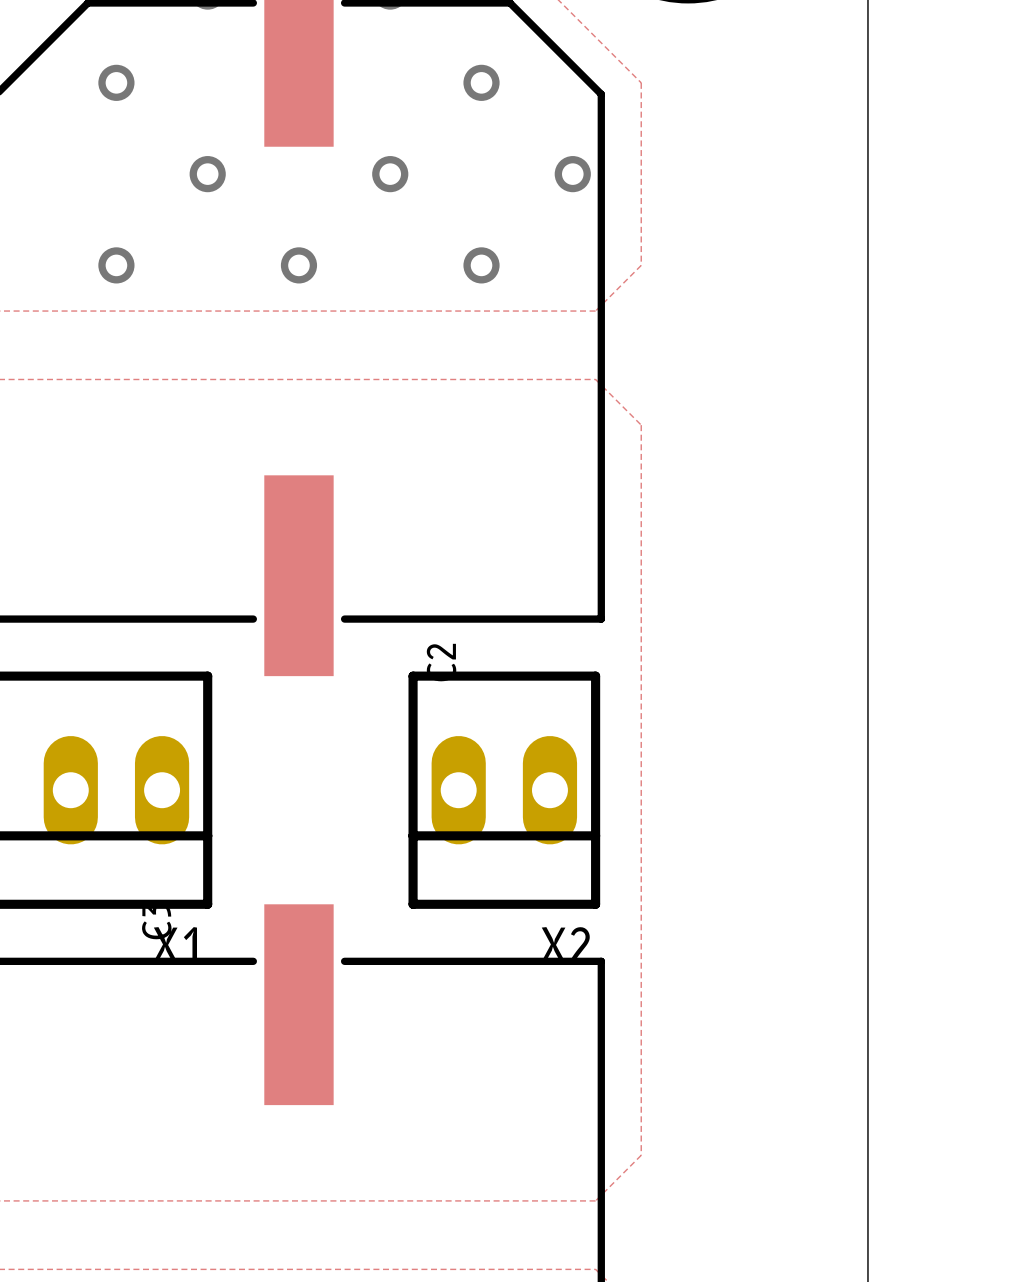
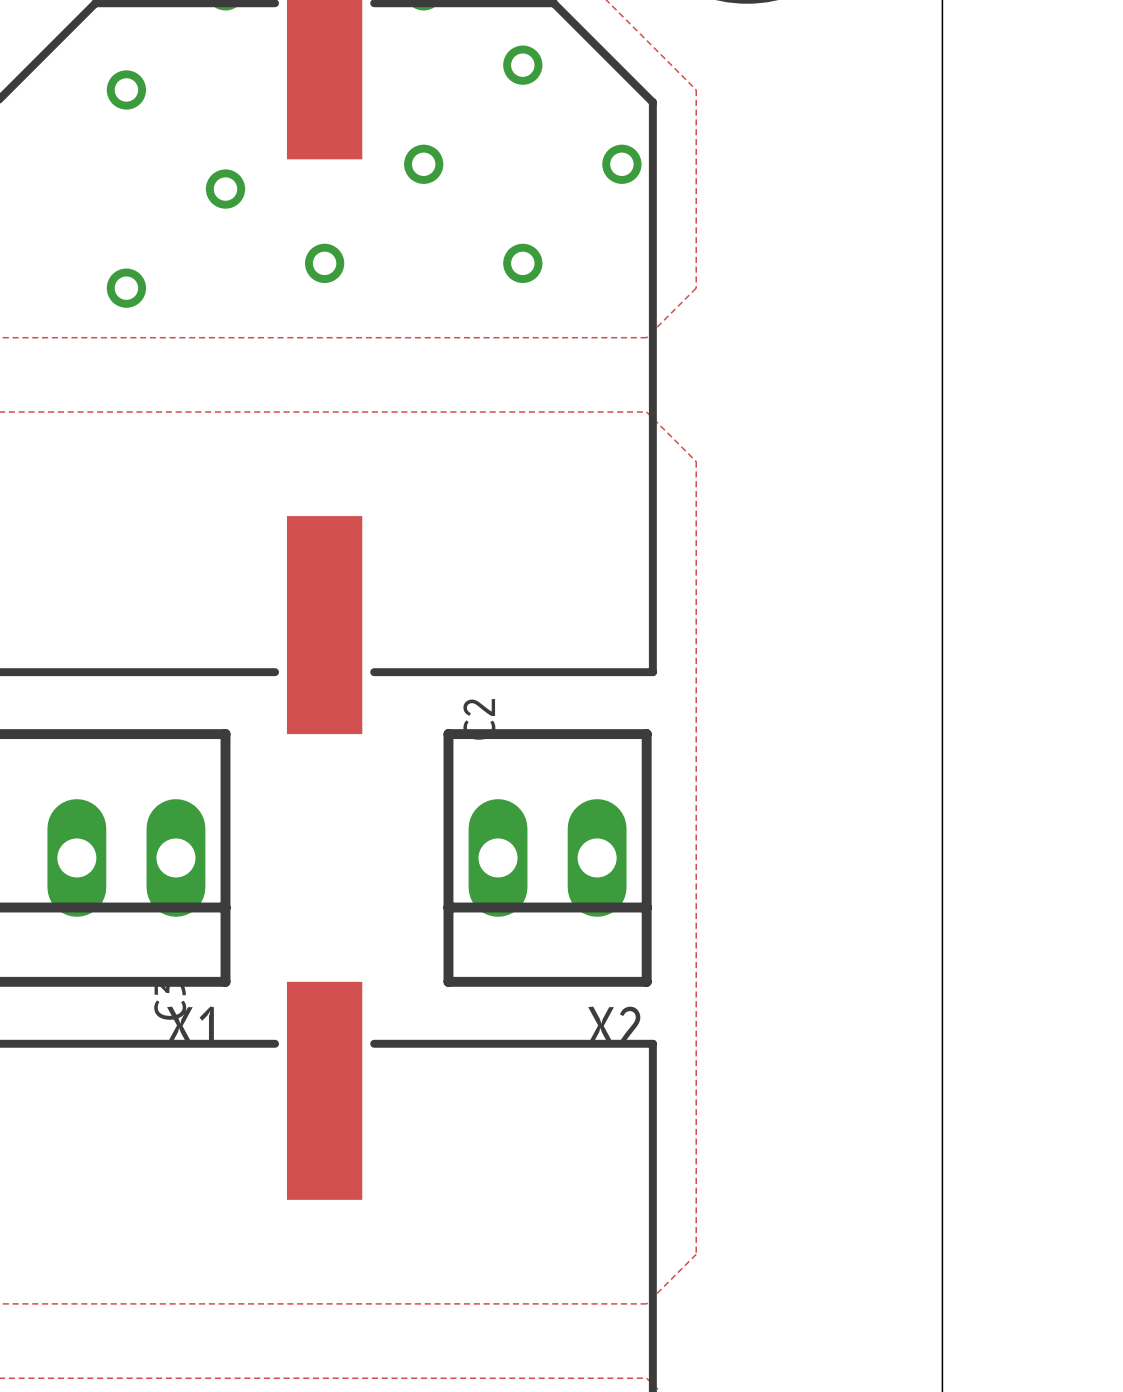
via position: (481, 82) -> (522, 65)
via position: (390, 174) -> (423, 164)
via position: (572, 174) -> (621, 164)
via position: (298, 265) -> (324, 263)
via position: (481, 265) -> (522, 263)

